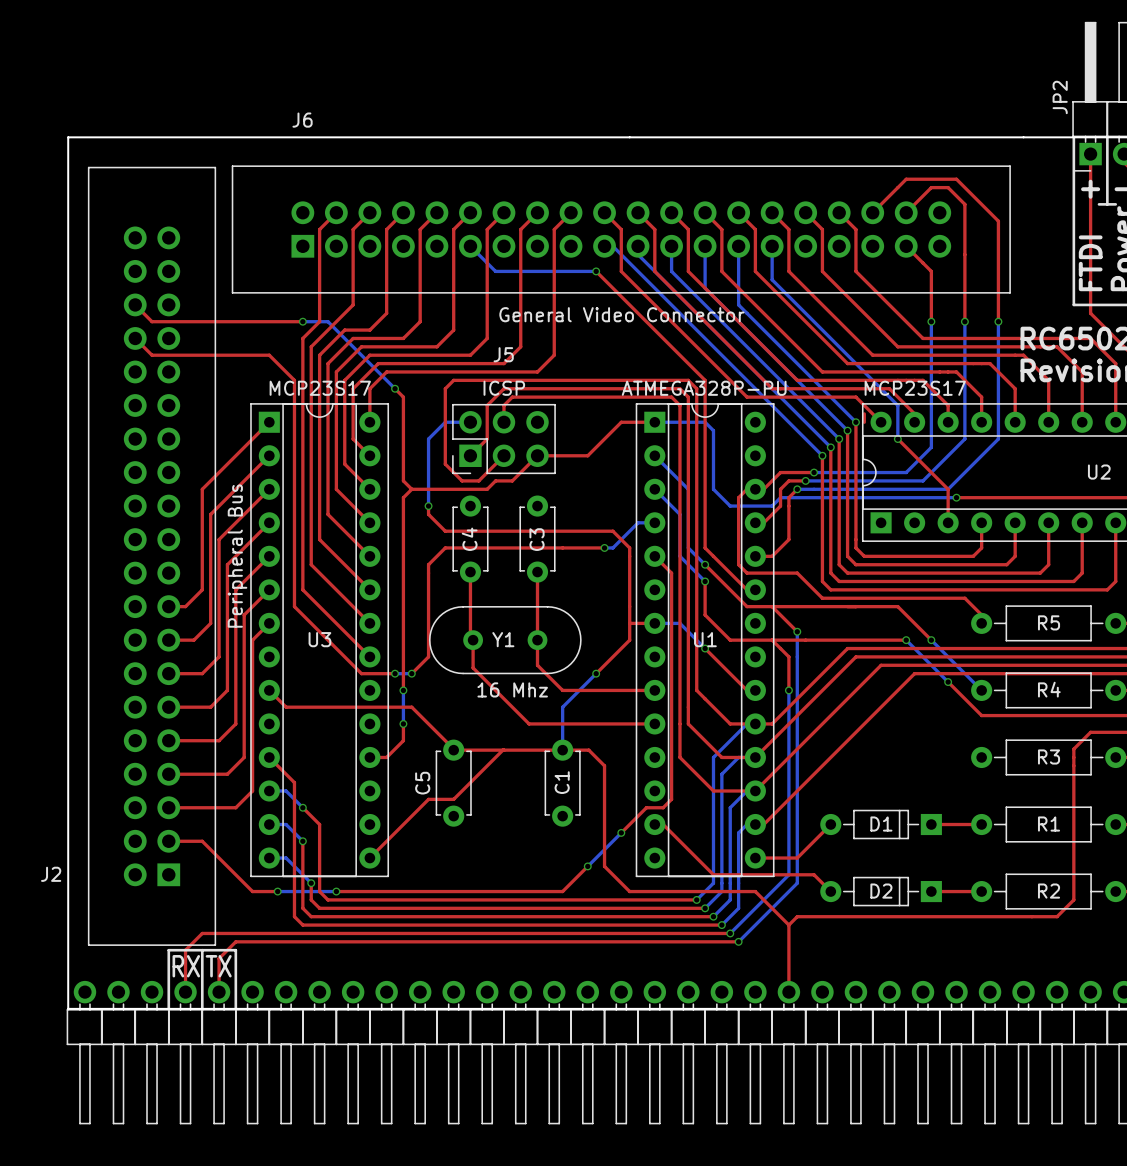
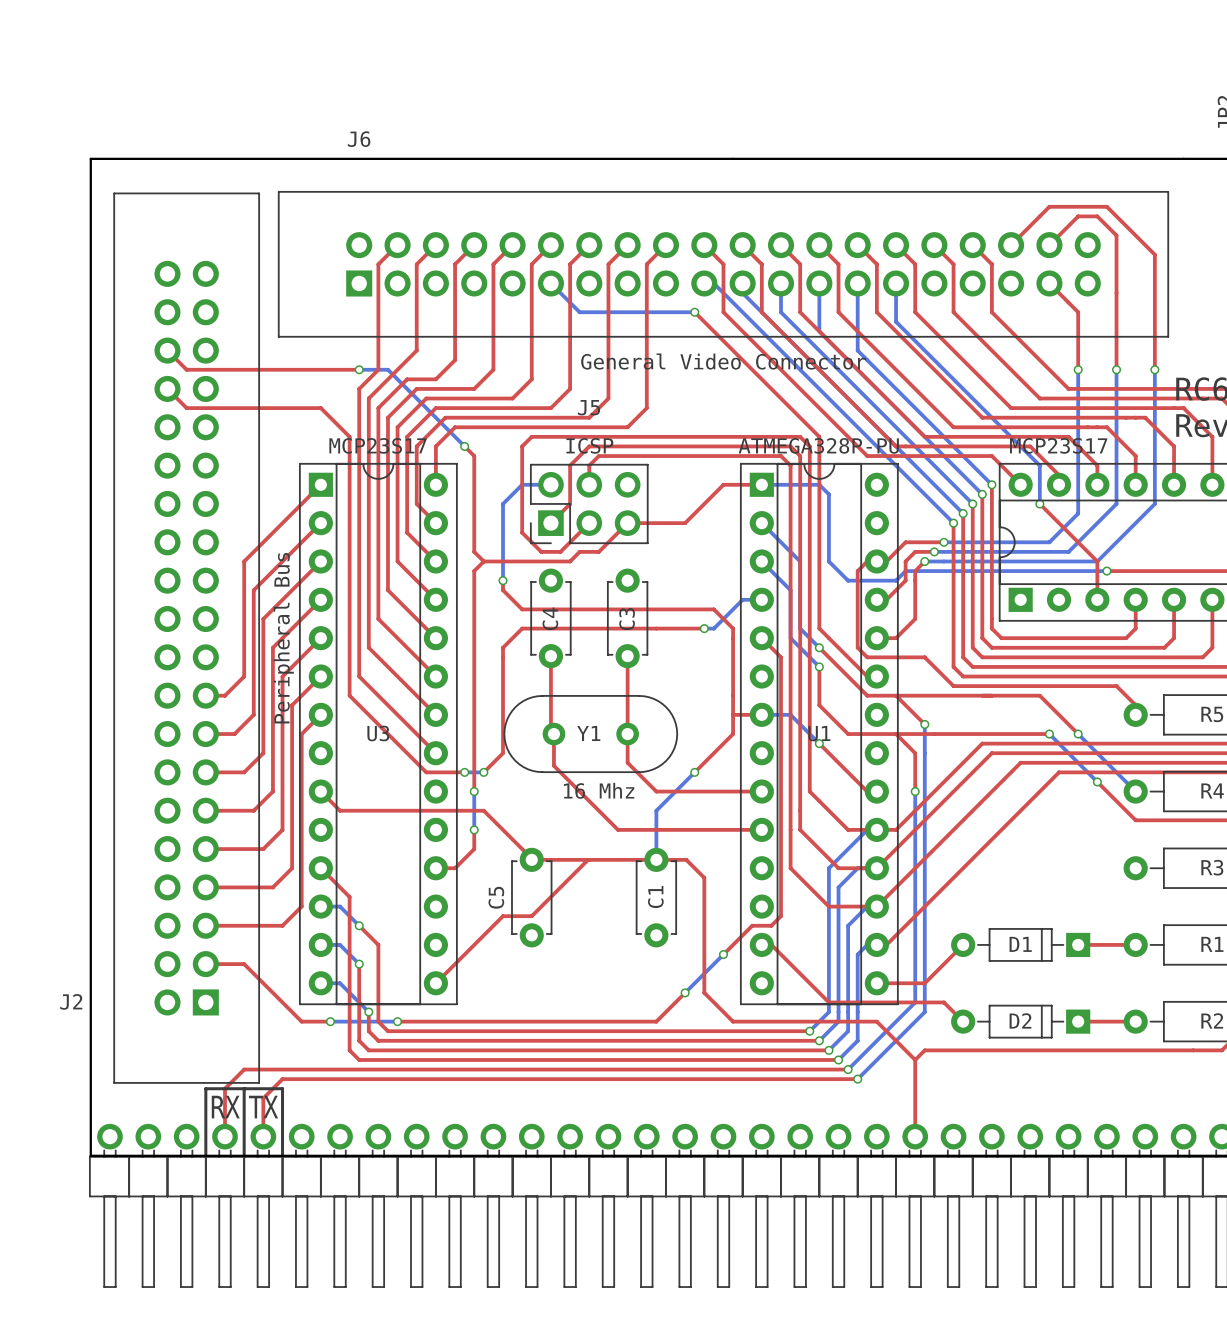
top track: (864, 413) (864, 422) -> none

